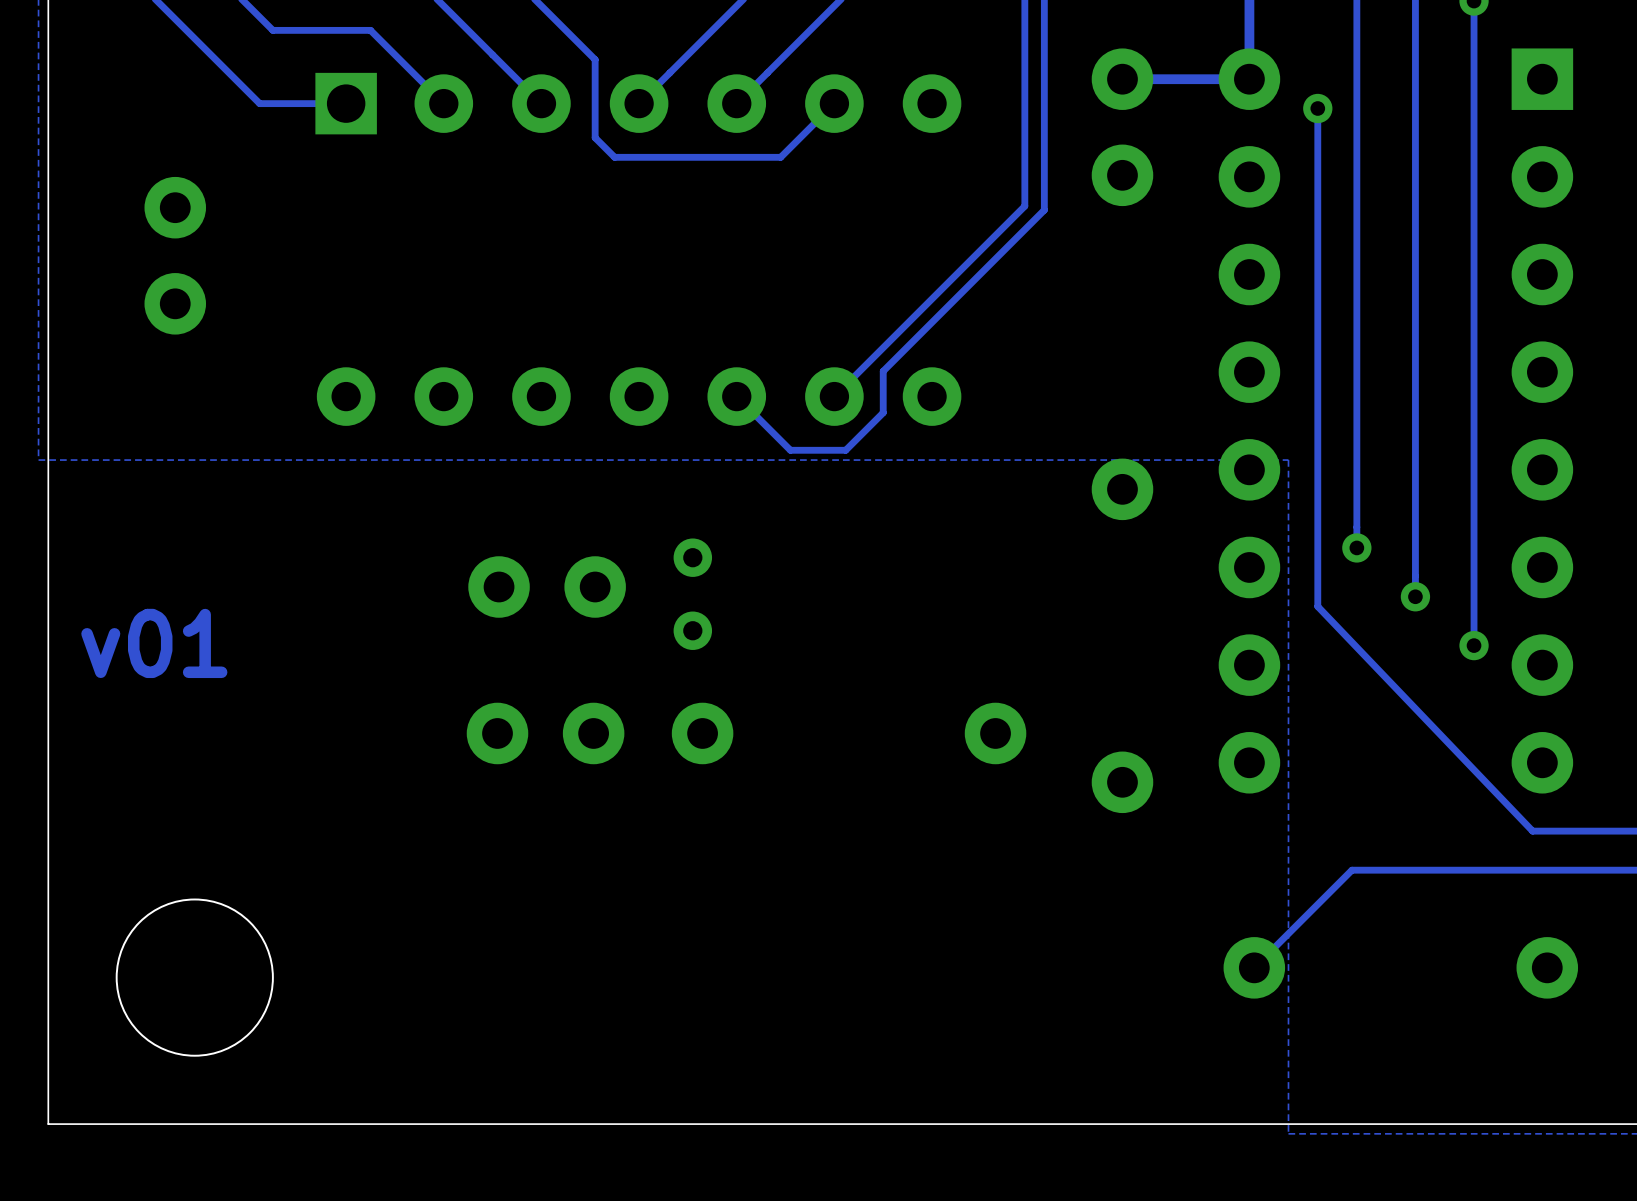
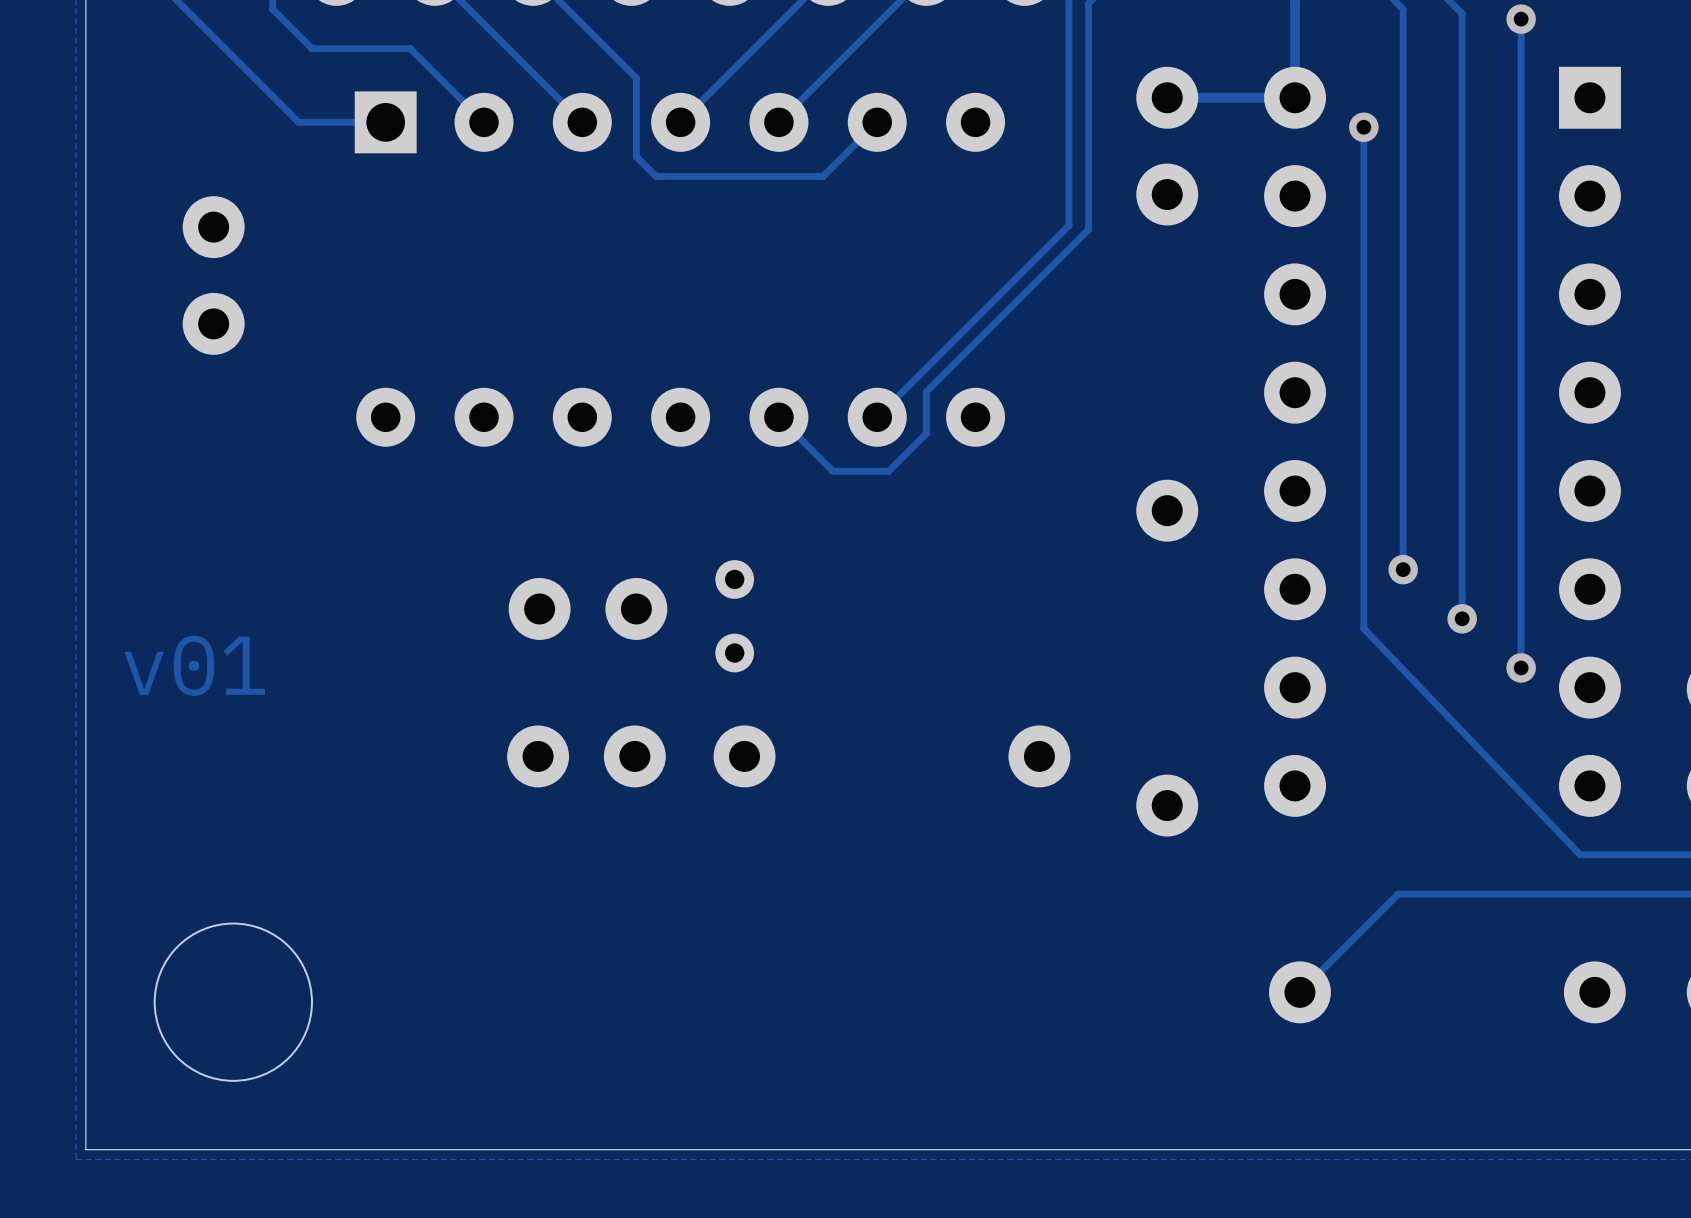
zone outline: (38, 460) (1288, 460) (1288, 1133) -> (76, 481) (76, 1159) (1334, 1159)

